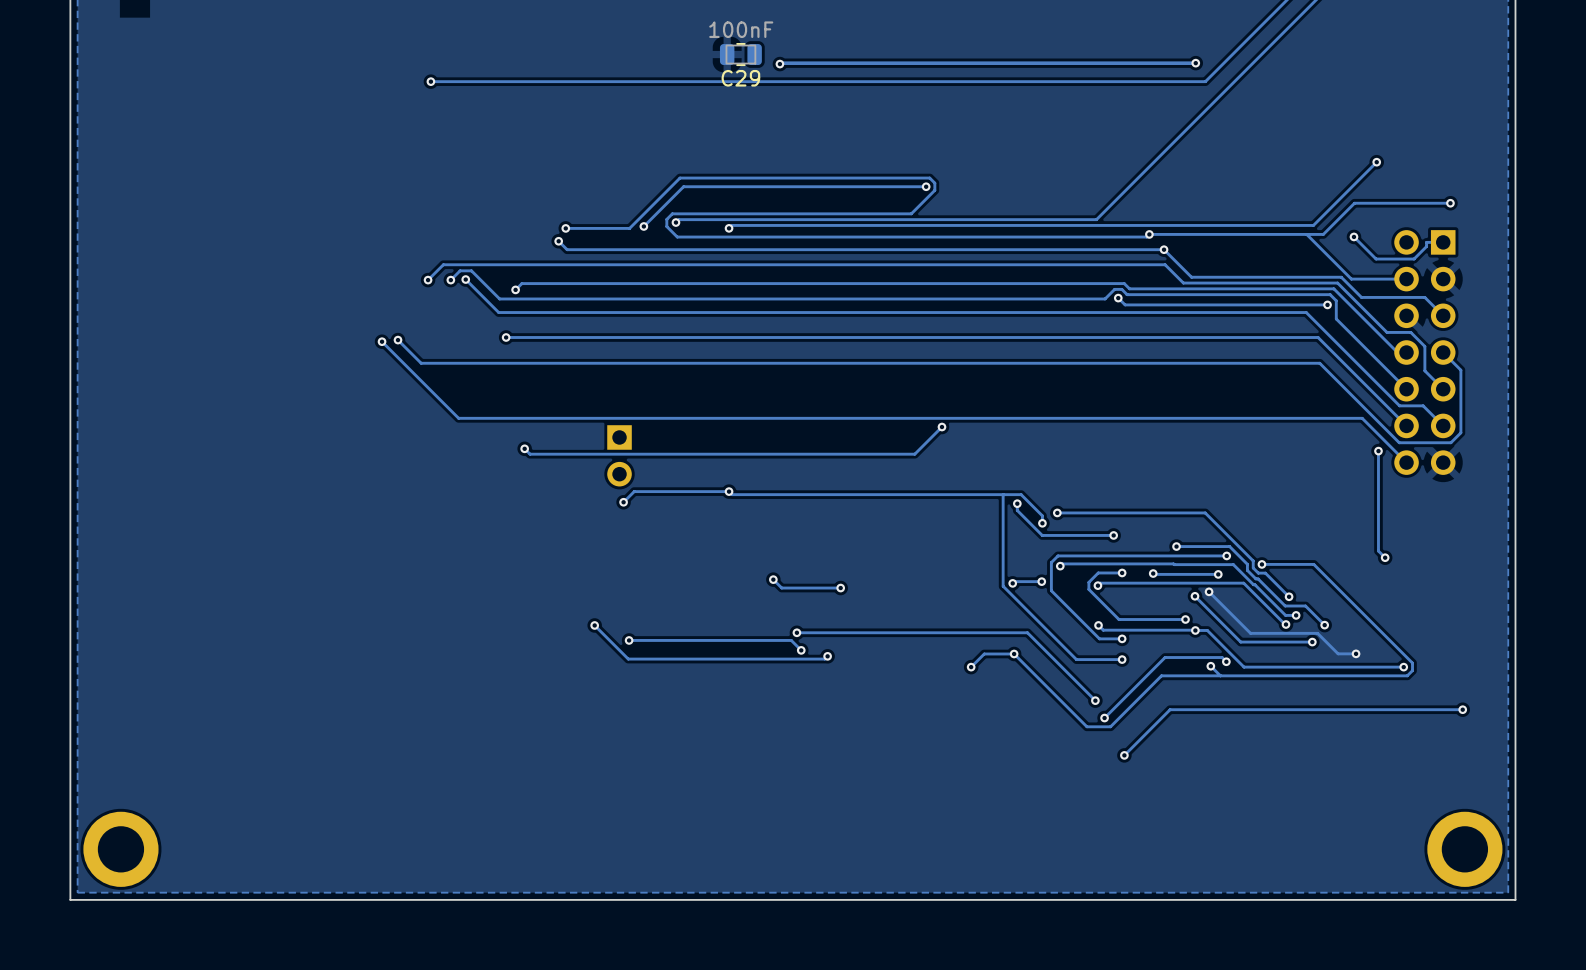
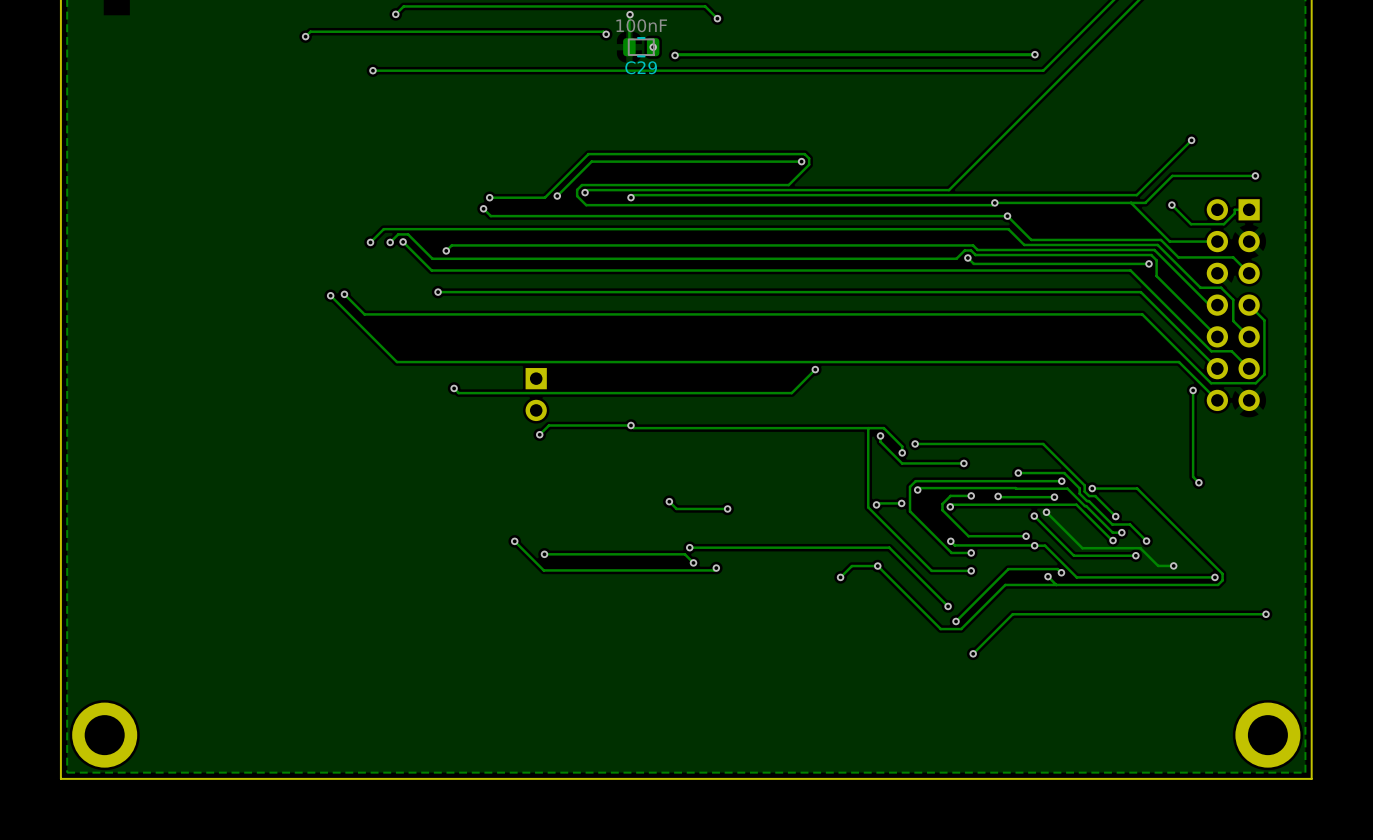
track: none -> (395, 14) (403, 6) (705, 6) (717, 18)
via: none -> (395, 14)
track: none -> (630, 14) (629, 47)
via: none -> (630, 14)
via: none -> (717, 18)
track: none -> (606, 34) (603, 31) (310, 31) (305, 36)
via: none -> (606, 34)
via: none -> (305, 36)
via: none -> (653, 47)

